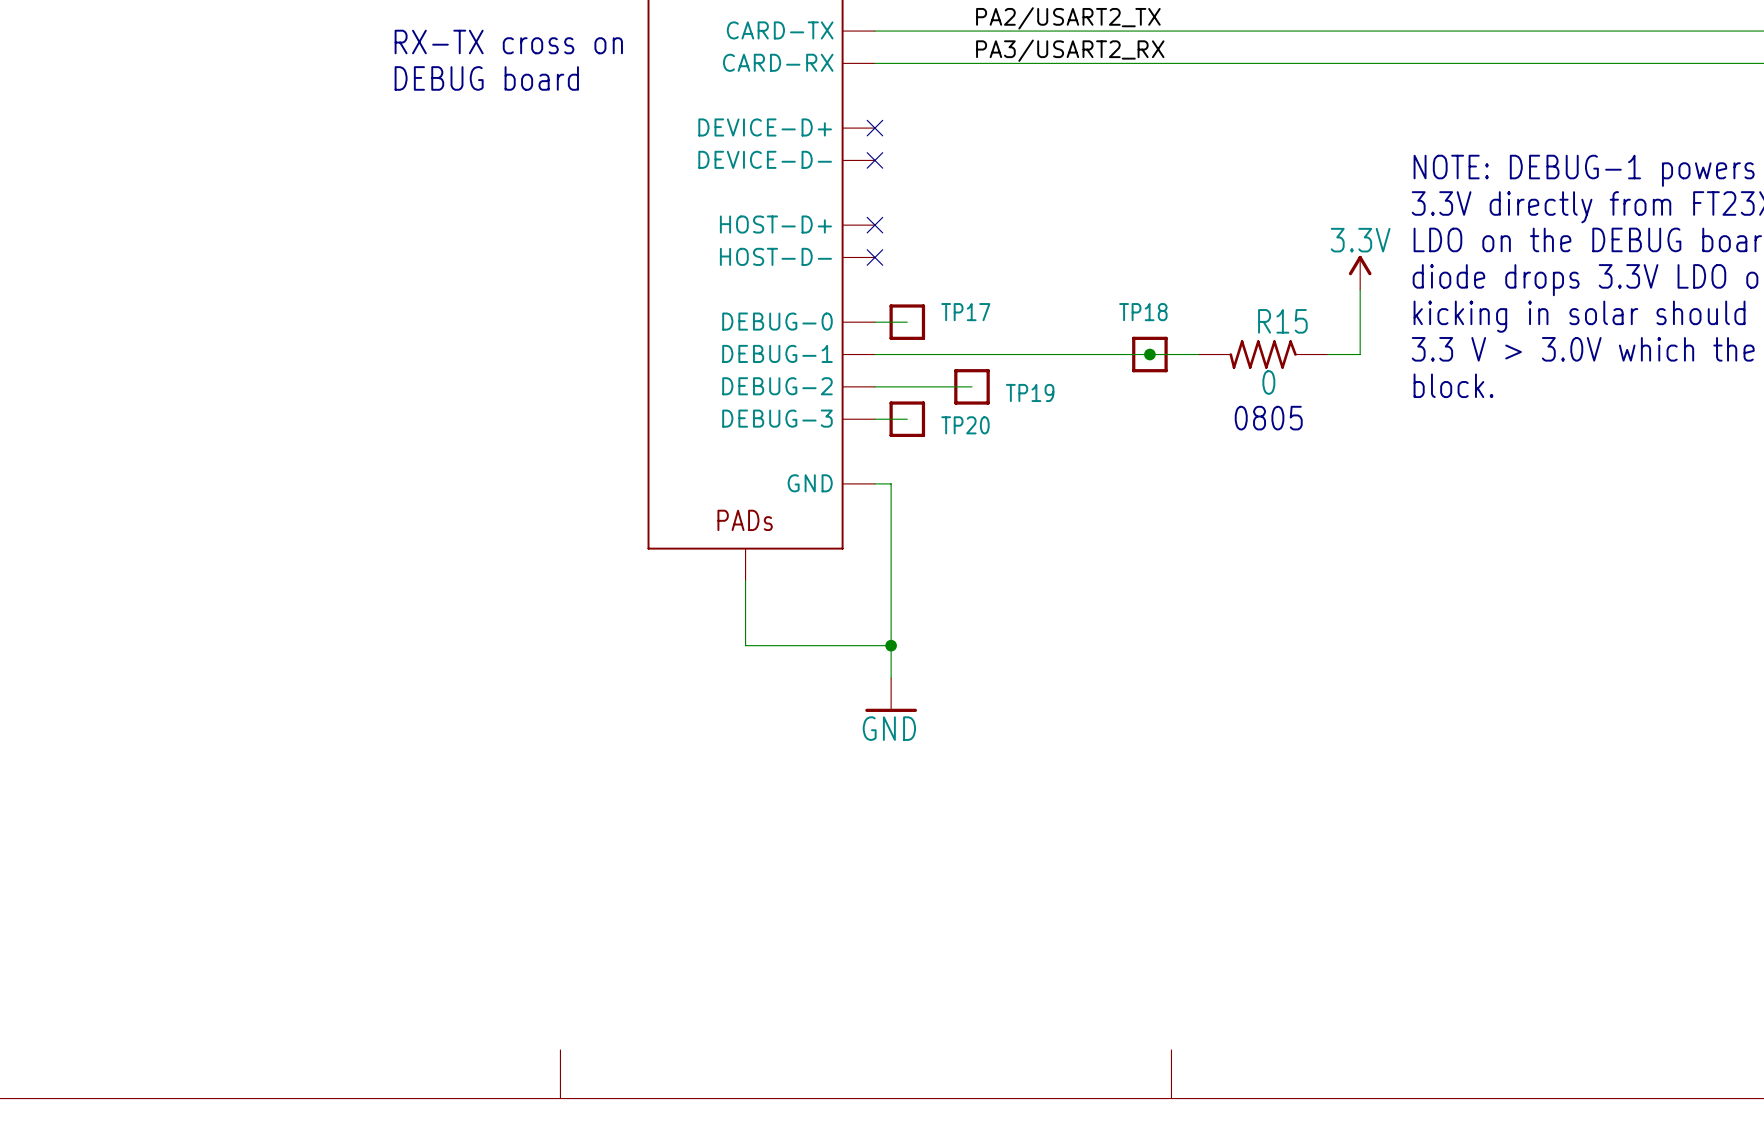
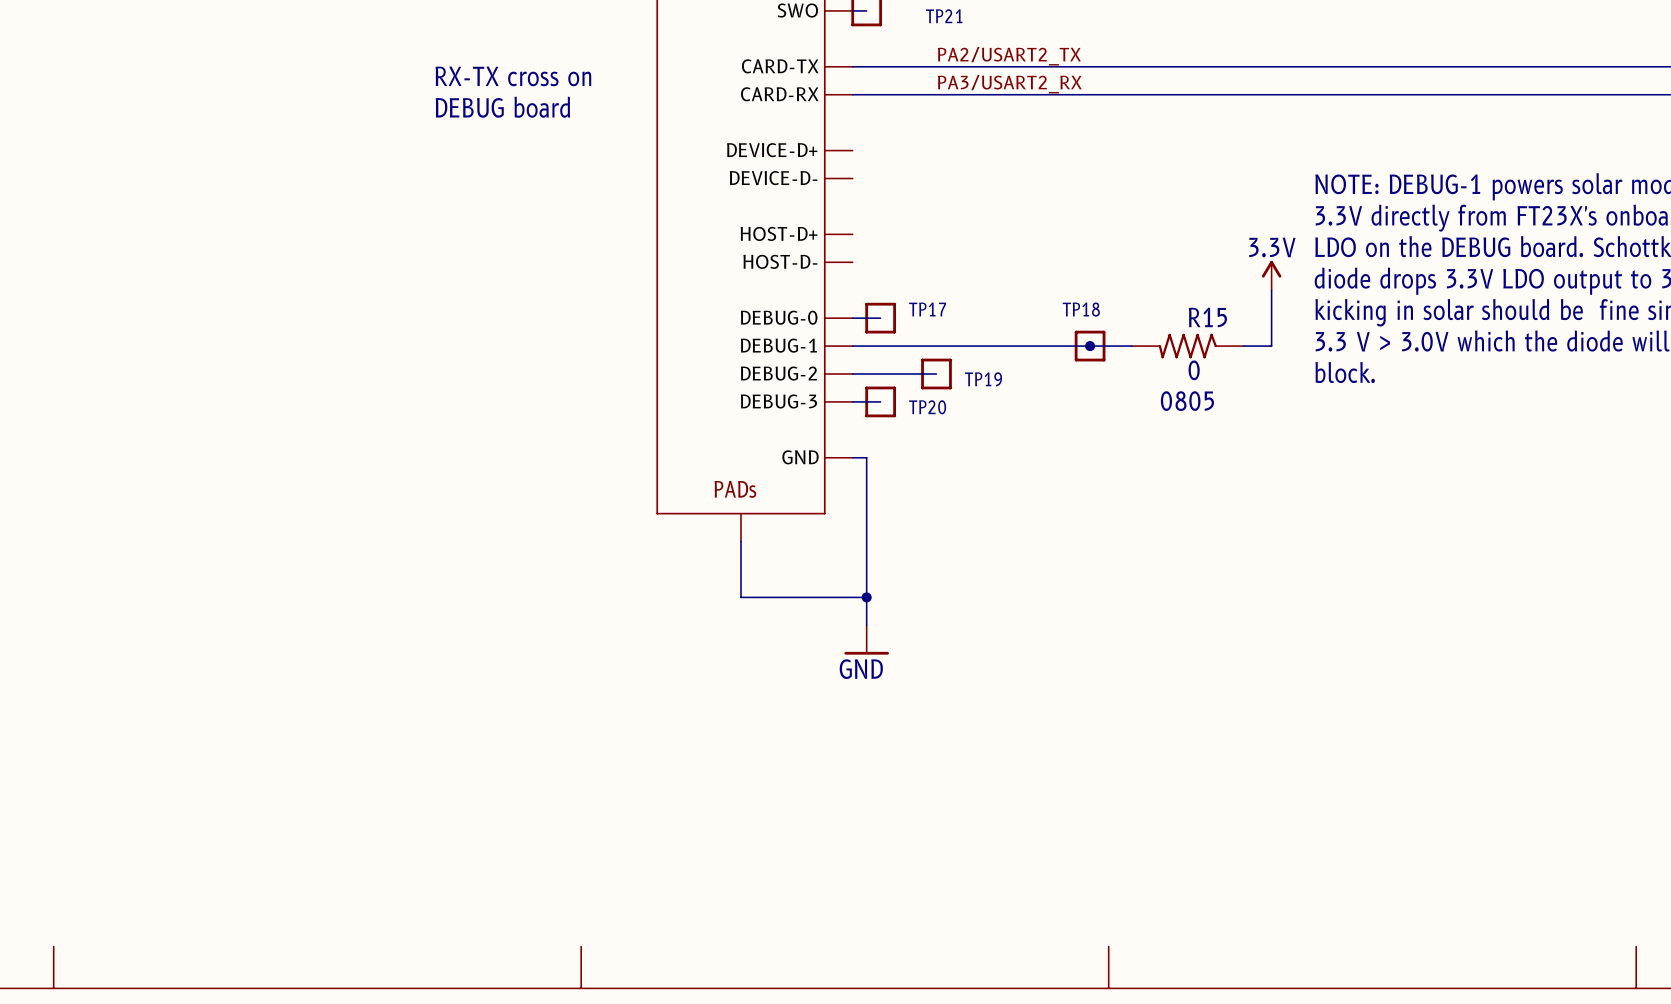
no-connect mark: (874, 128) -> none
no-connect mark: (874, 160) -> none
no-connect mark: (874, 225) -> none
no-connect mark: (874, 257) -> none

